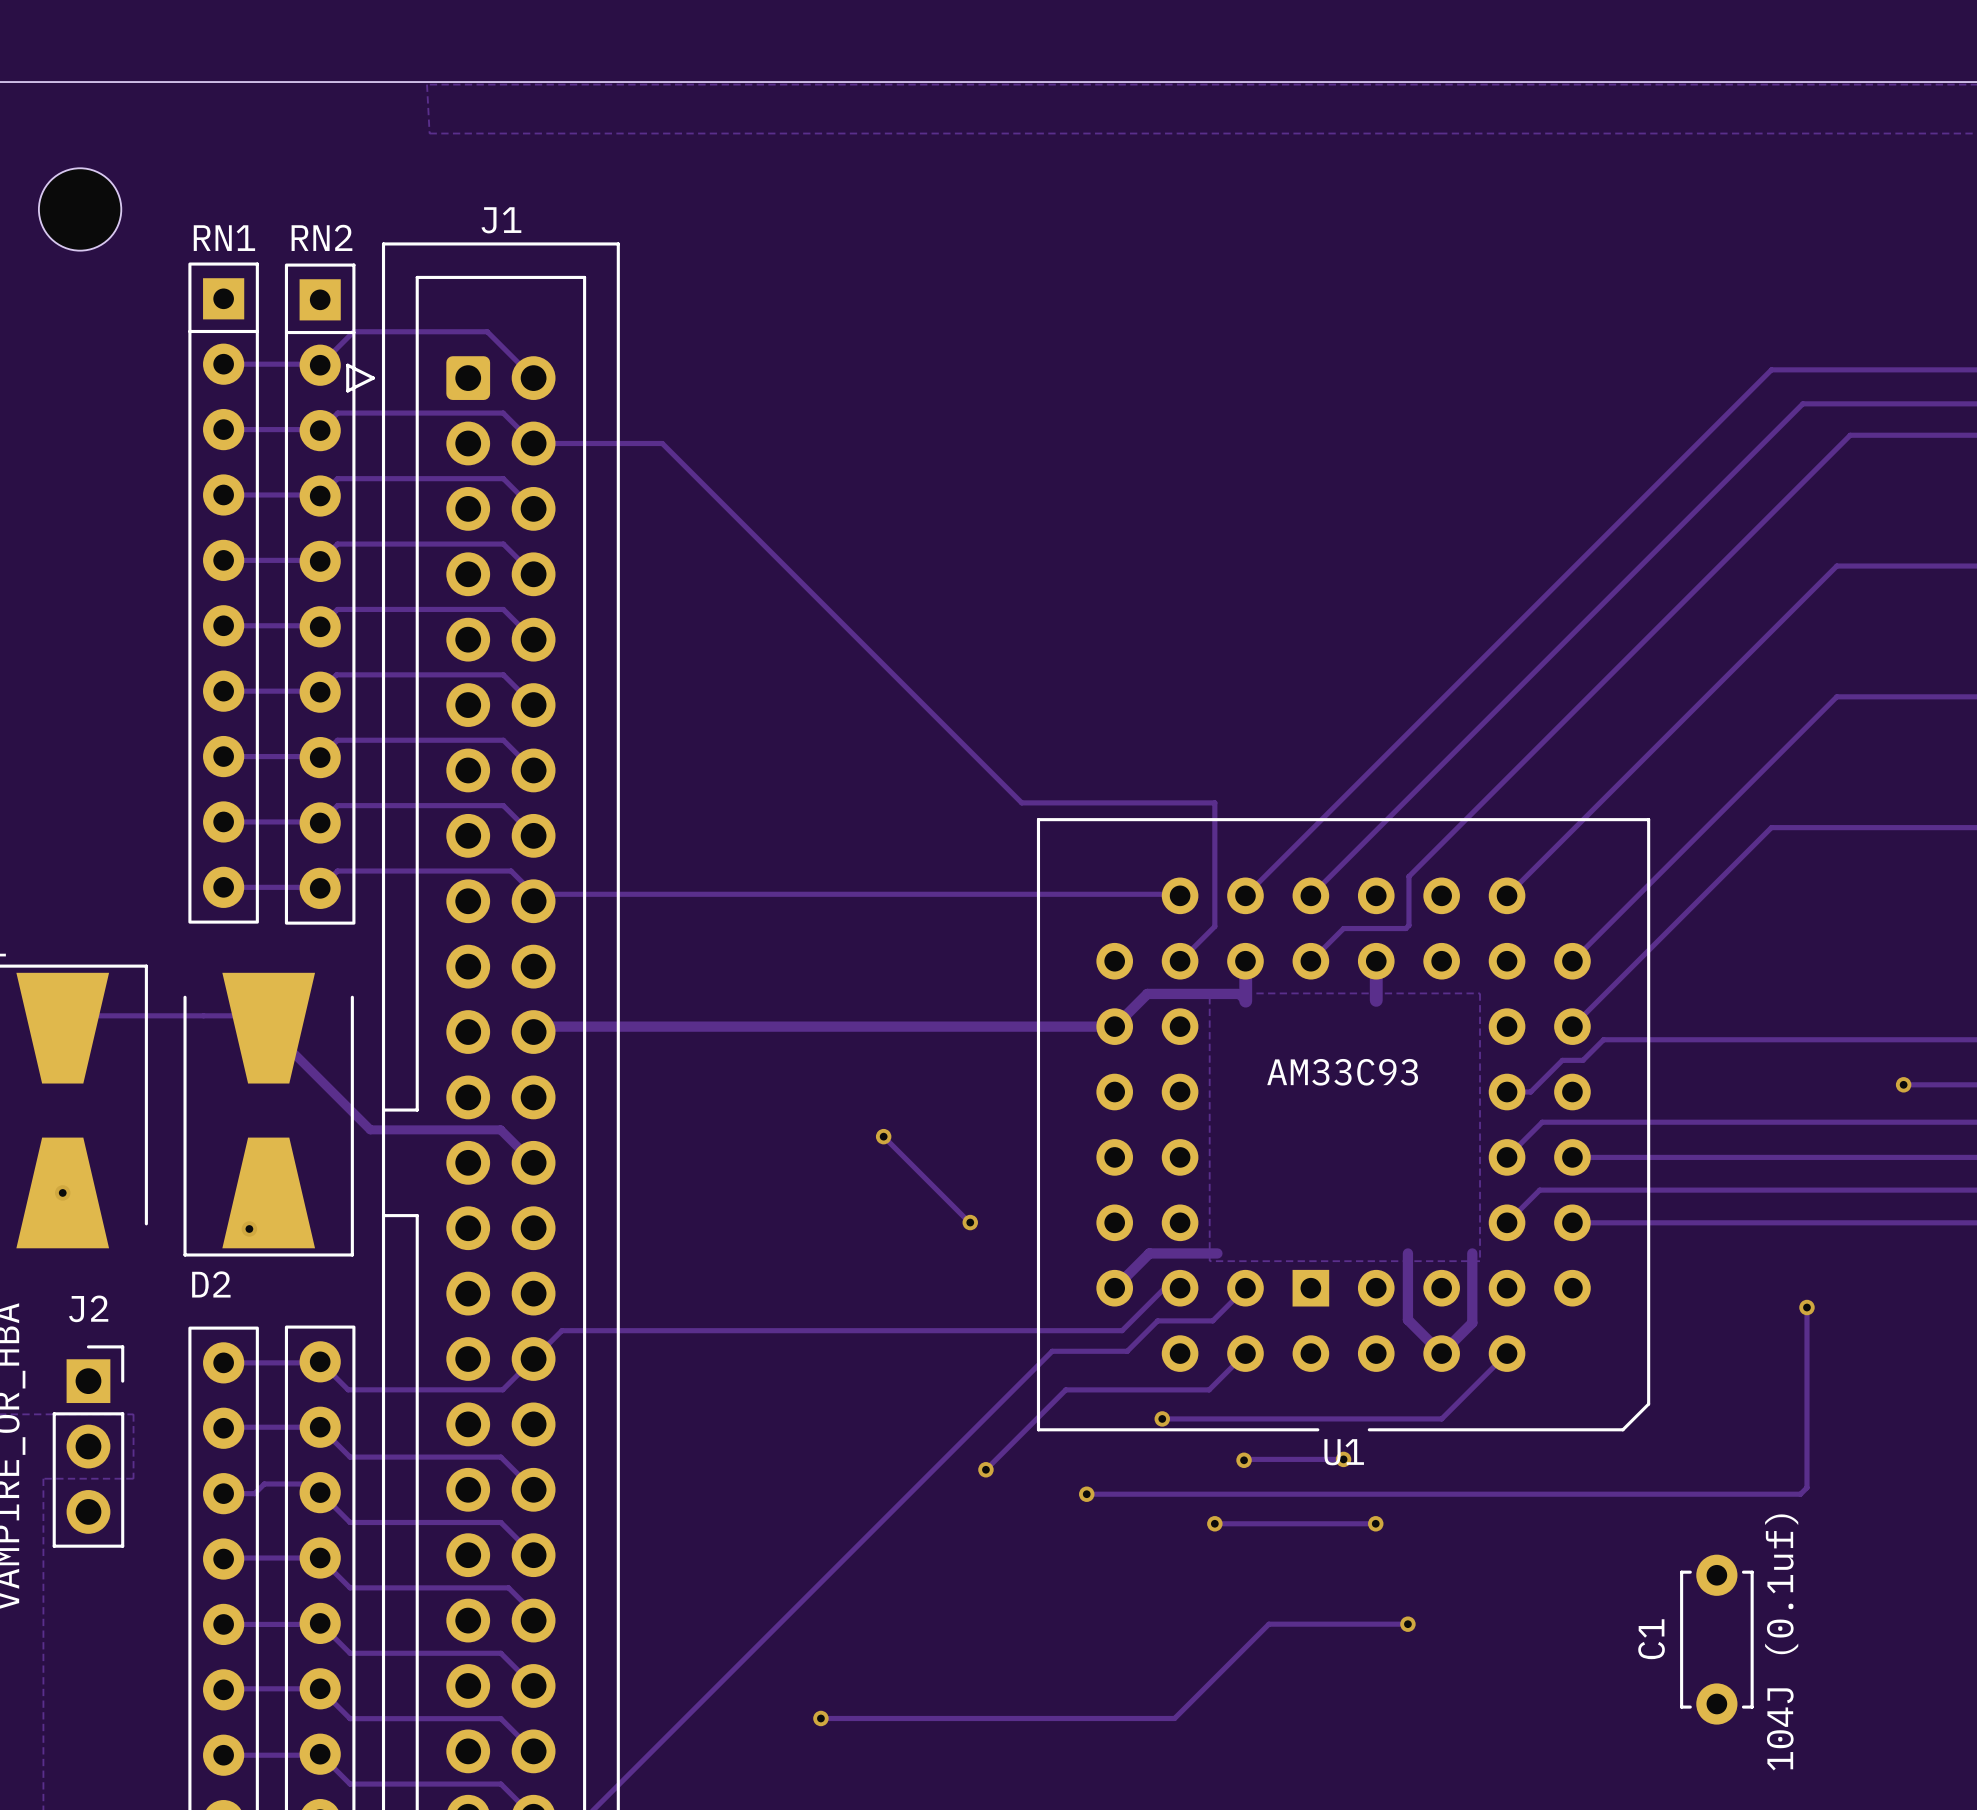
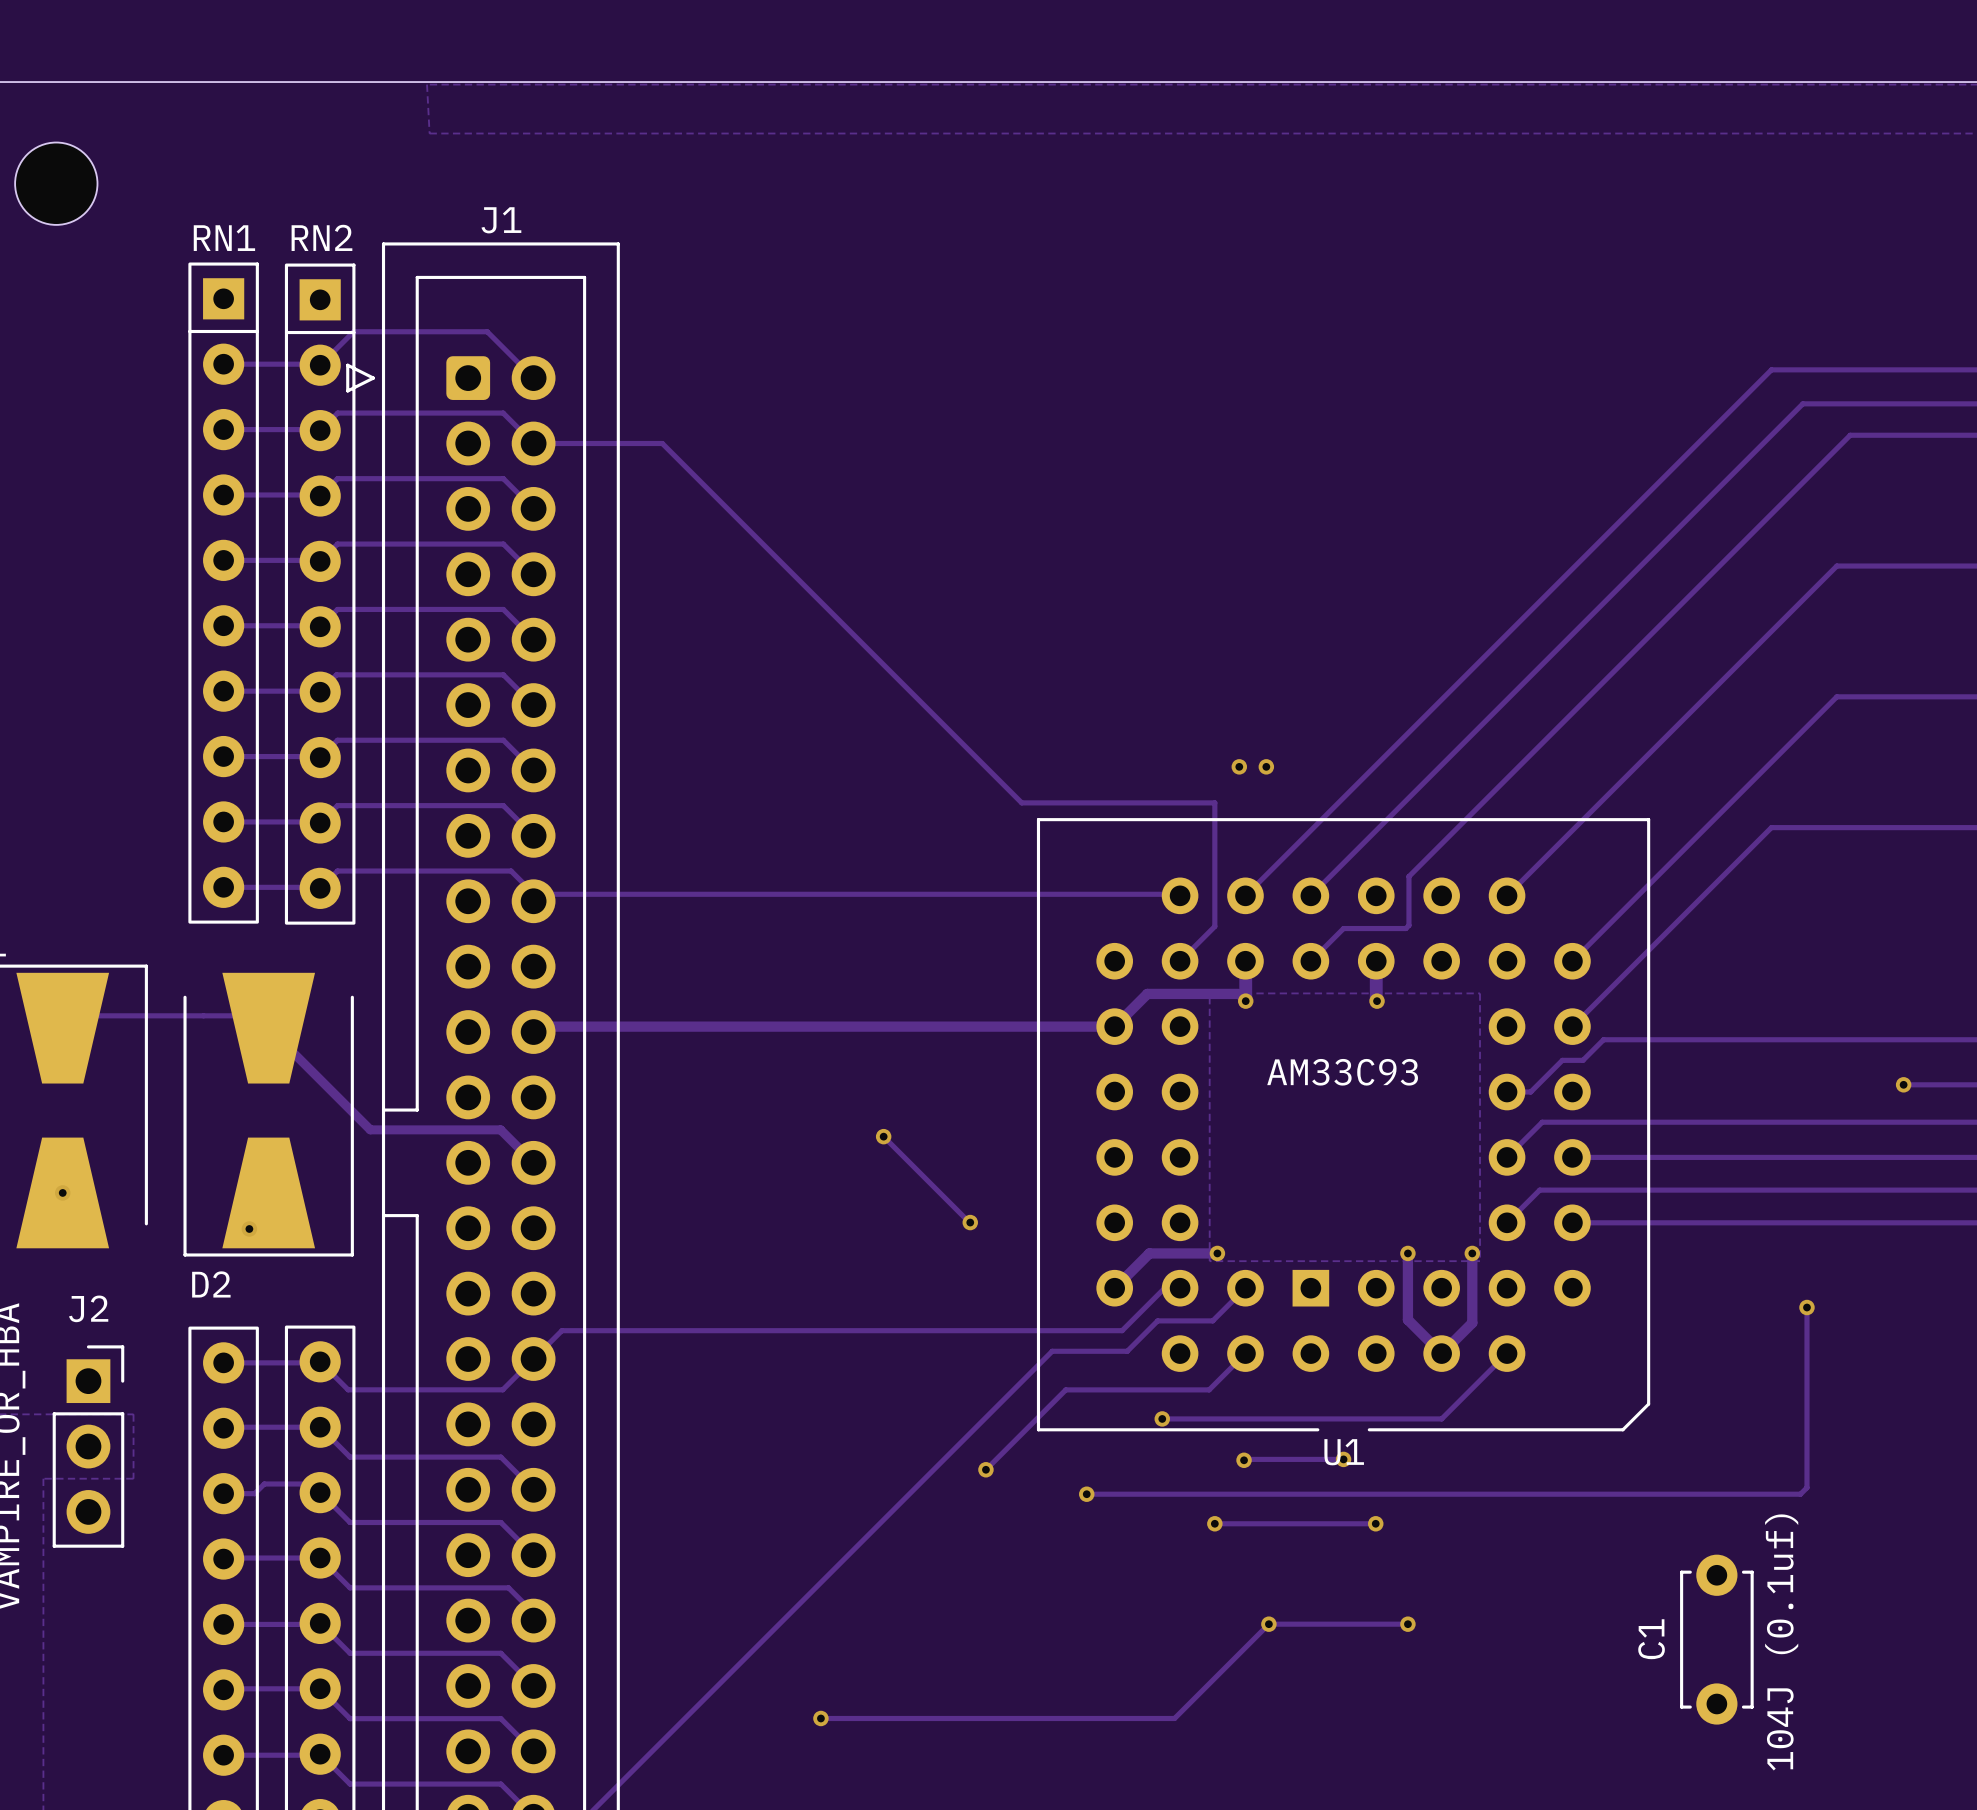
part position: (80, 209) -> (56, 183)
via: none -> (1239, 766)
via: none -> (1266, 766)
via: none -> (1245, 1001)
via: none -> (1377, 1001)
via: none -> (1217, 1253)
via: none -> (1407, 1253)
via: none -> (1472, 1253)
via: none -> (1268, 1624)

